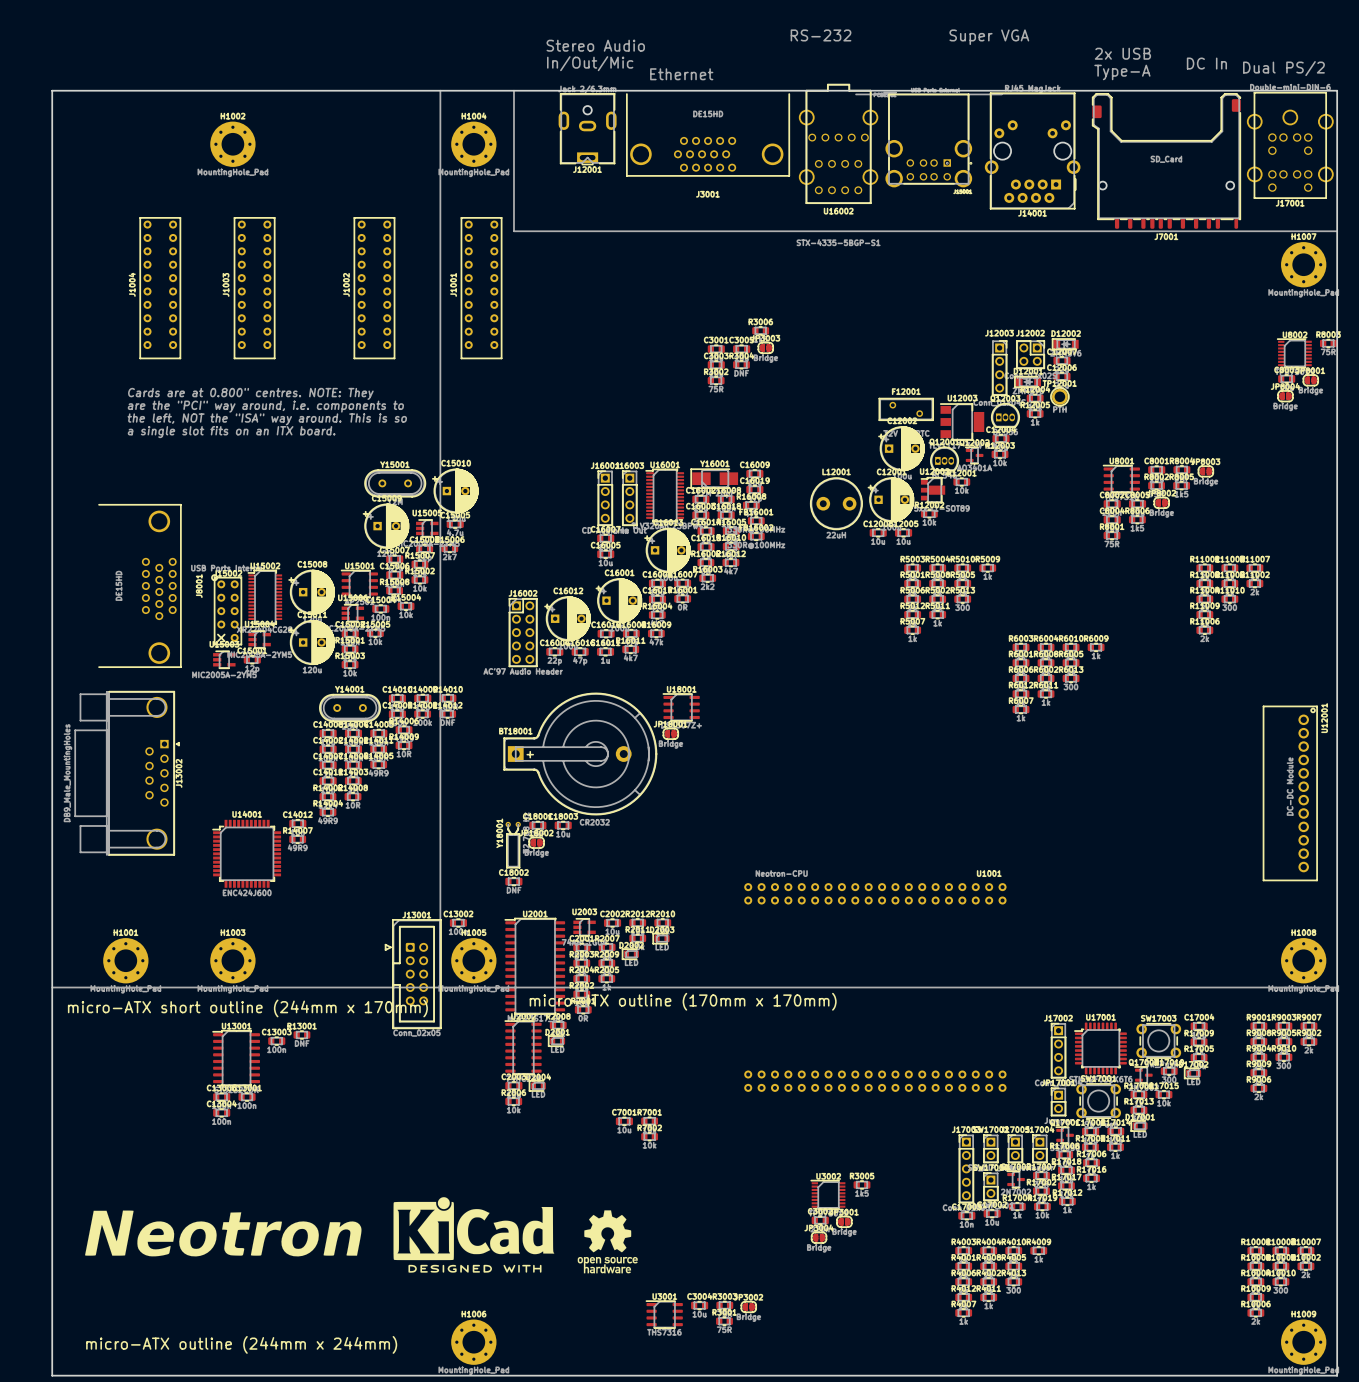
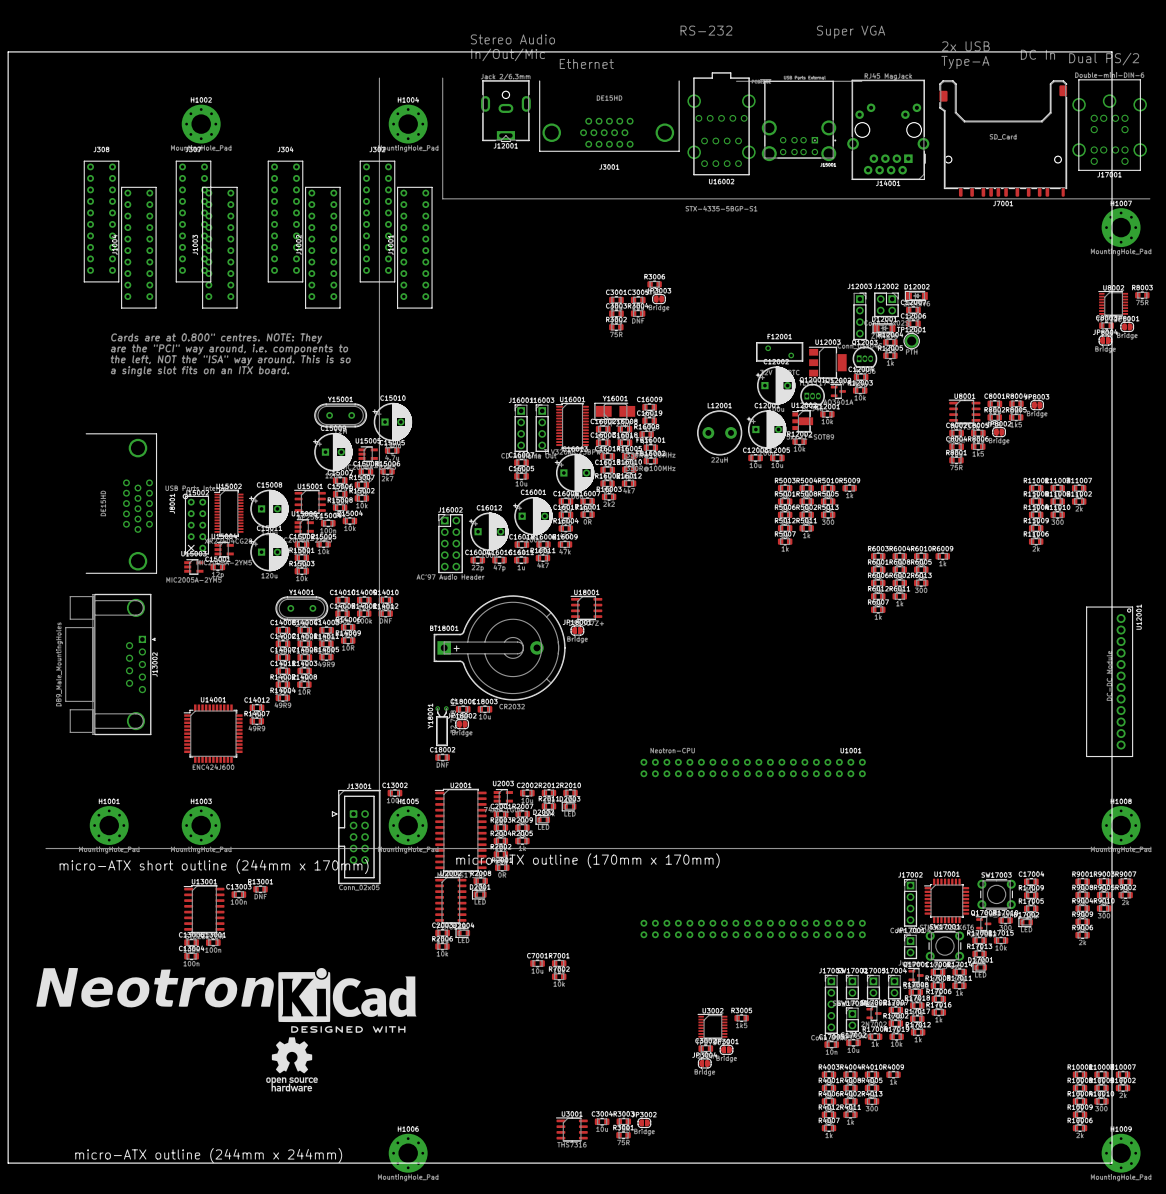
board edge: (52, 90) (1337, 90) (1337, 1375) (52, 1375) (52, 90) -> (8, 51) (8, 1163) (1112, 1163) (1112, 51) (8, 51)
part: none -> (101, 221)
part: none -> (193, 221)
part: none -> (285, 221)
part: none -> (377, 221)
drawing: none -> [266, 1037, 318, 1092]
drawing: [577, 1210, 638, 1274] -> none
drawing position: (223, 1233) -> (155, 987)
drawing position: (473, 1234) -> (347, 1000)

